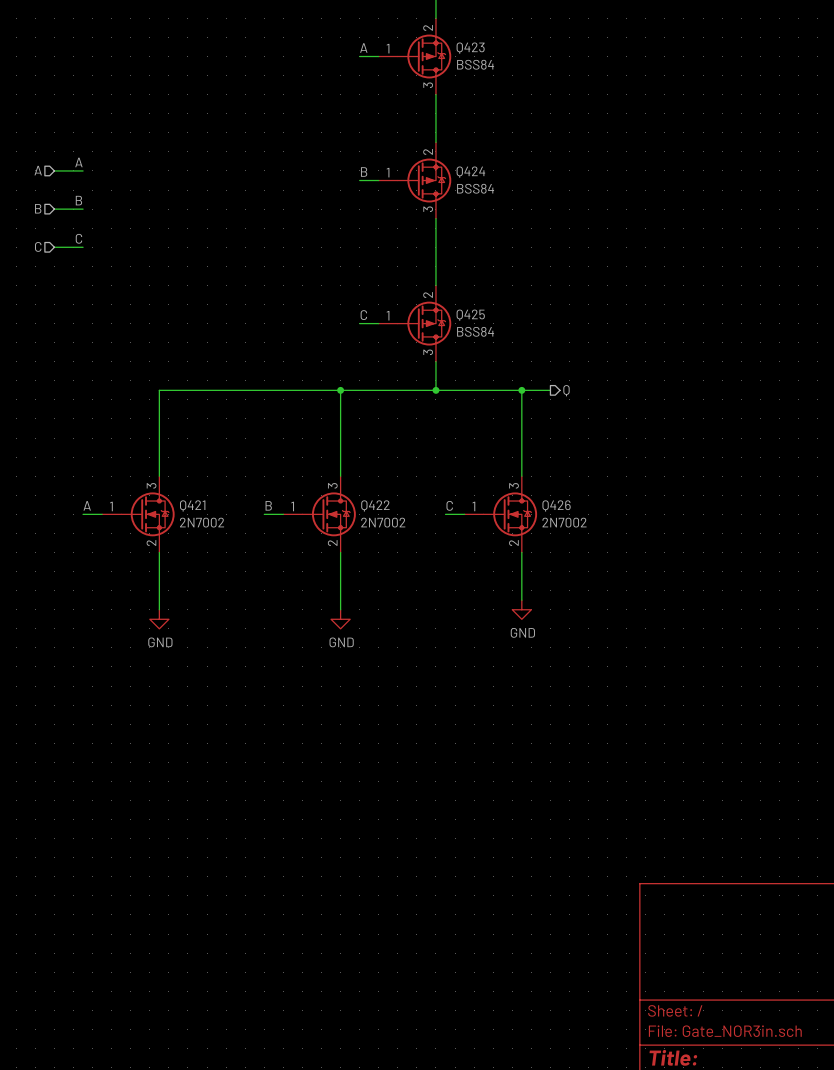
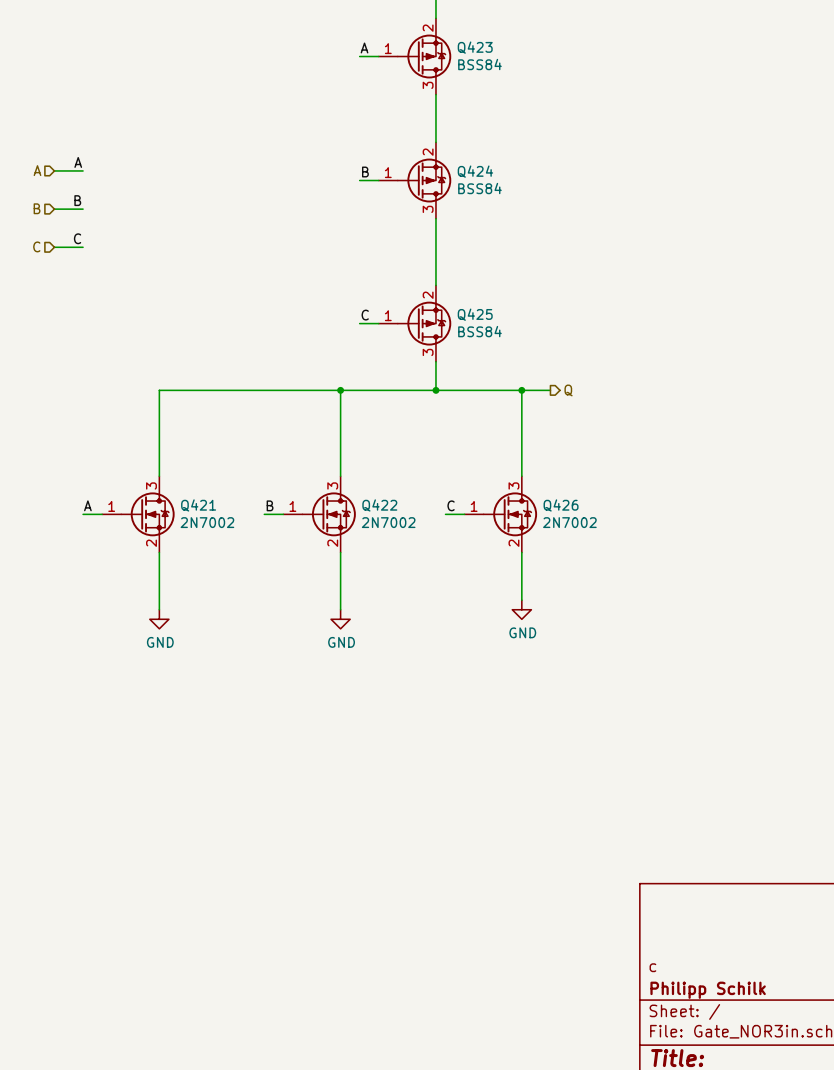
title block: none -> c (652, 967)
title block: none -> Philipp Schilk (708, 990)

